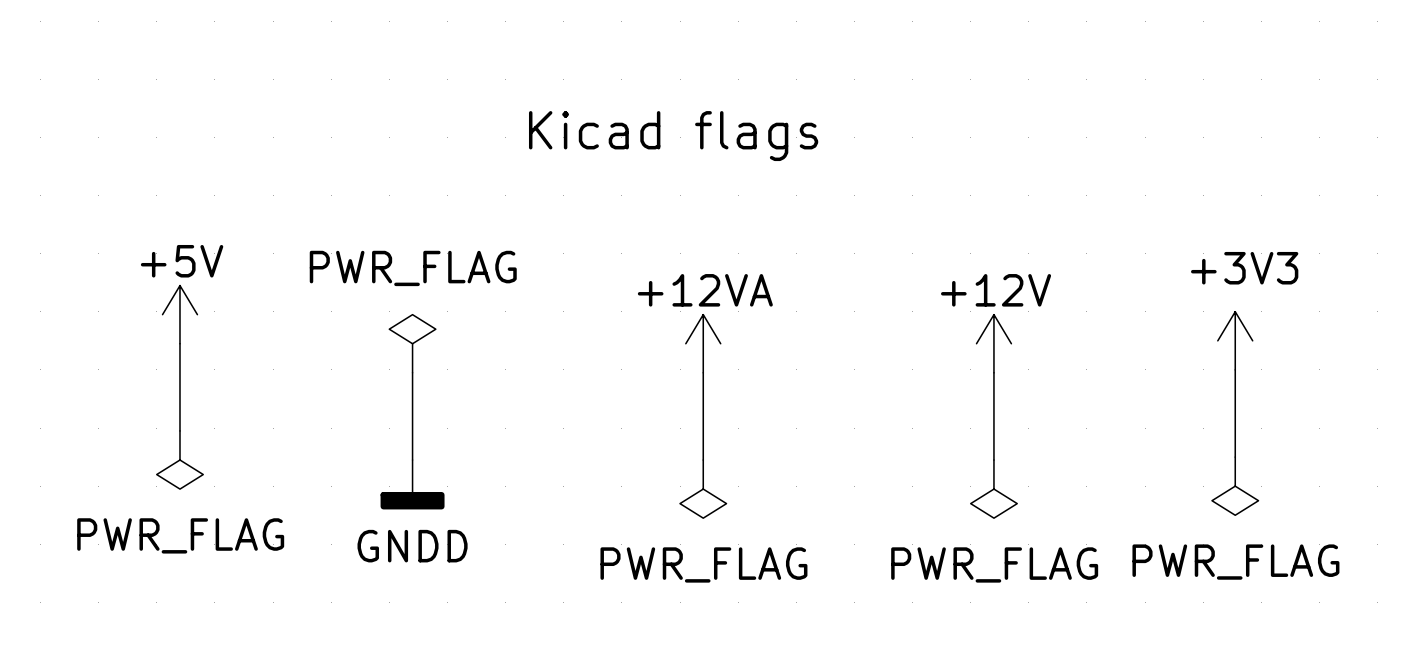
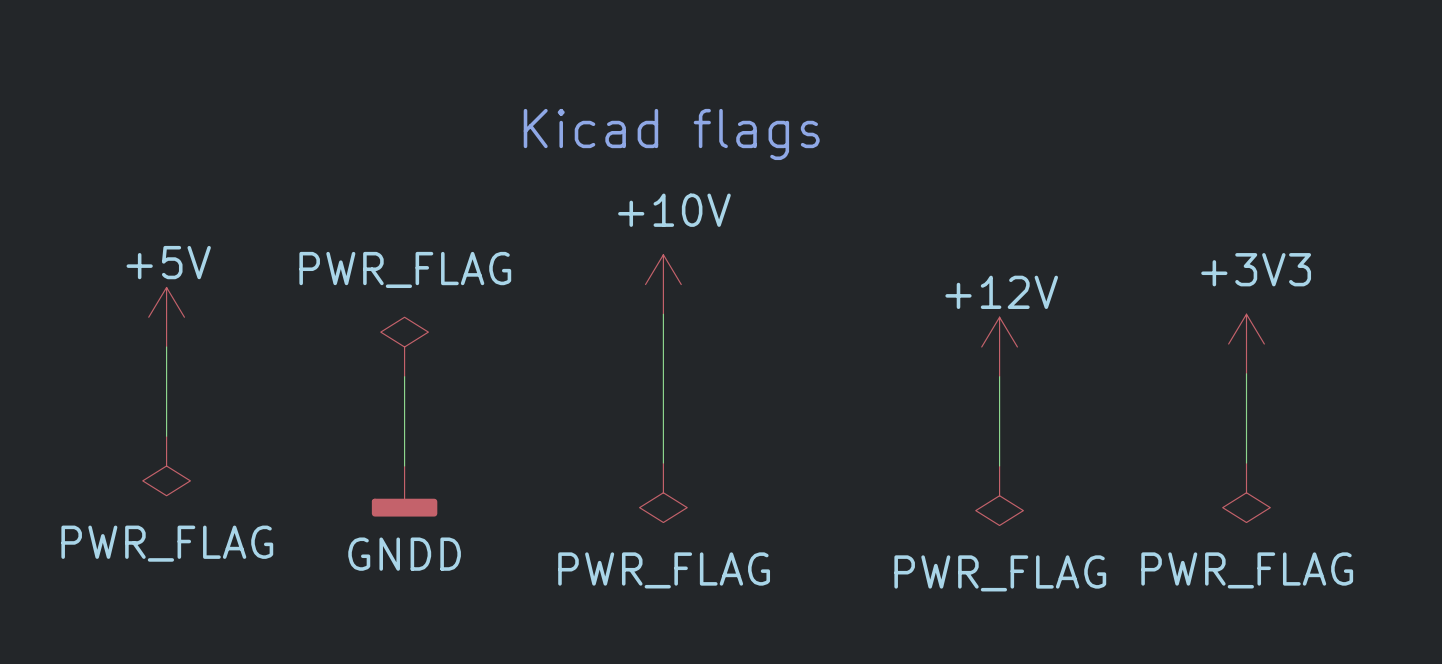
power symbol: none -> +10V (663, 284)
wire: none -> (663, 314) (663, 463)
power symbol: +12VA (703, 343) -> none
wire: (703, 372) (703, 460) -> none
power symbol position: PWR_FLAG (703, 489) -> PWR_FLAG (663, 492)

